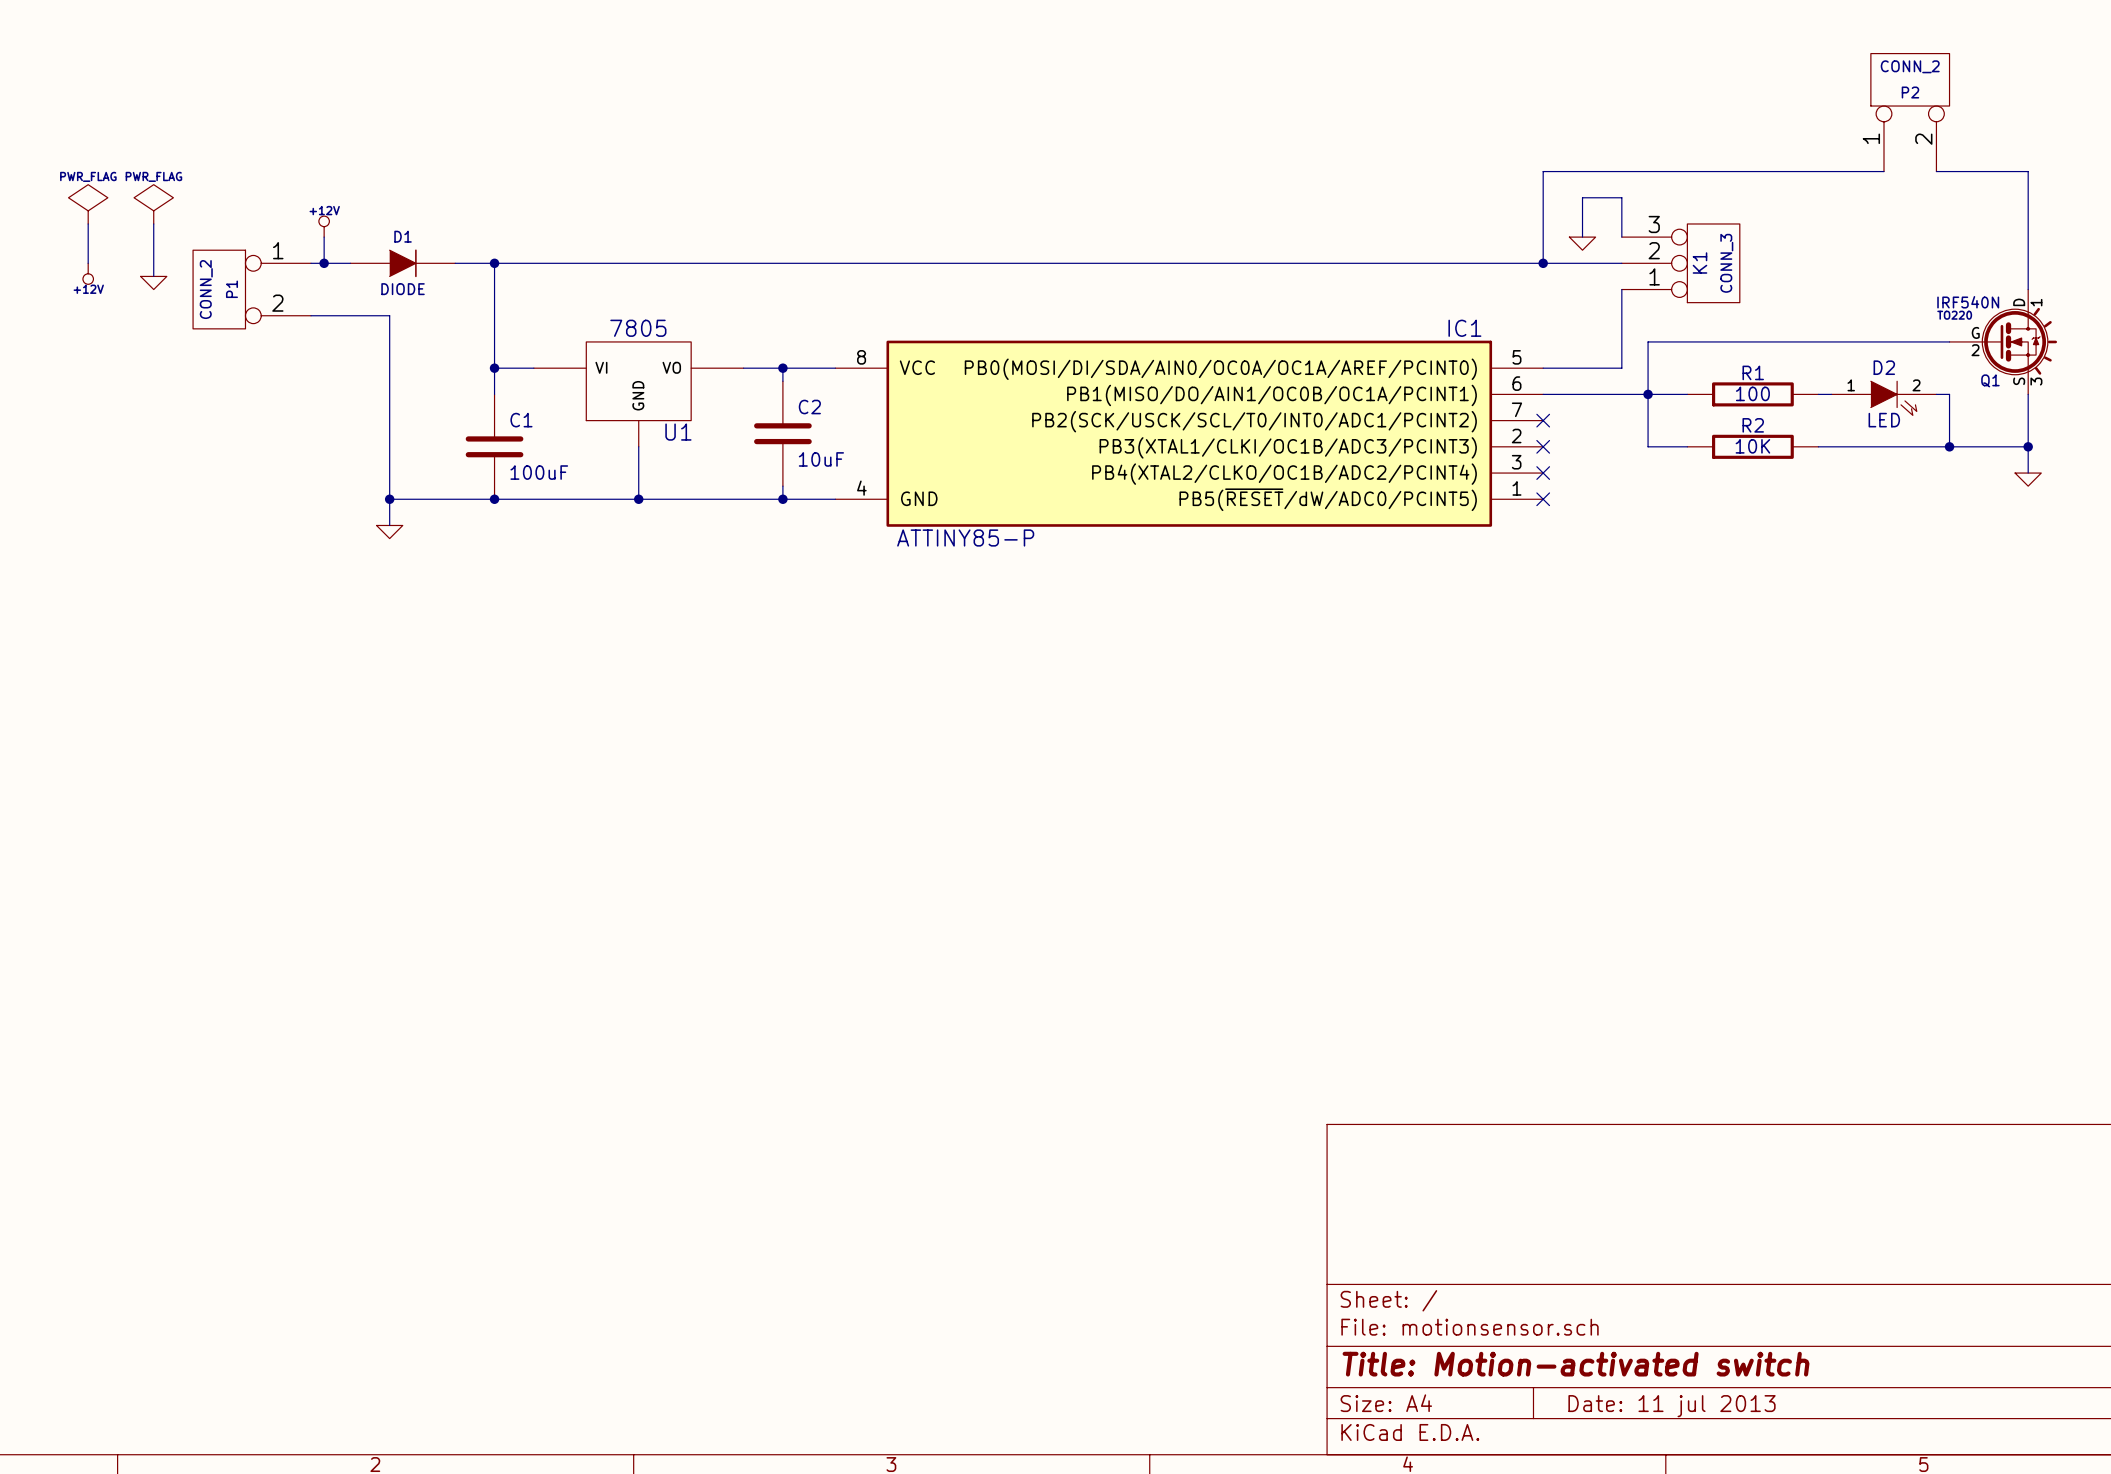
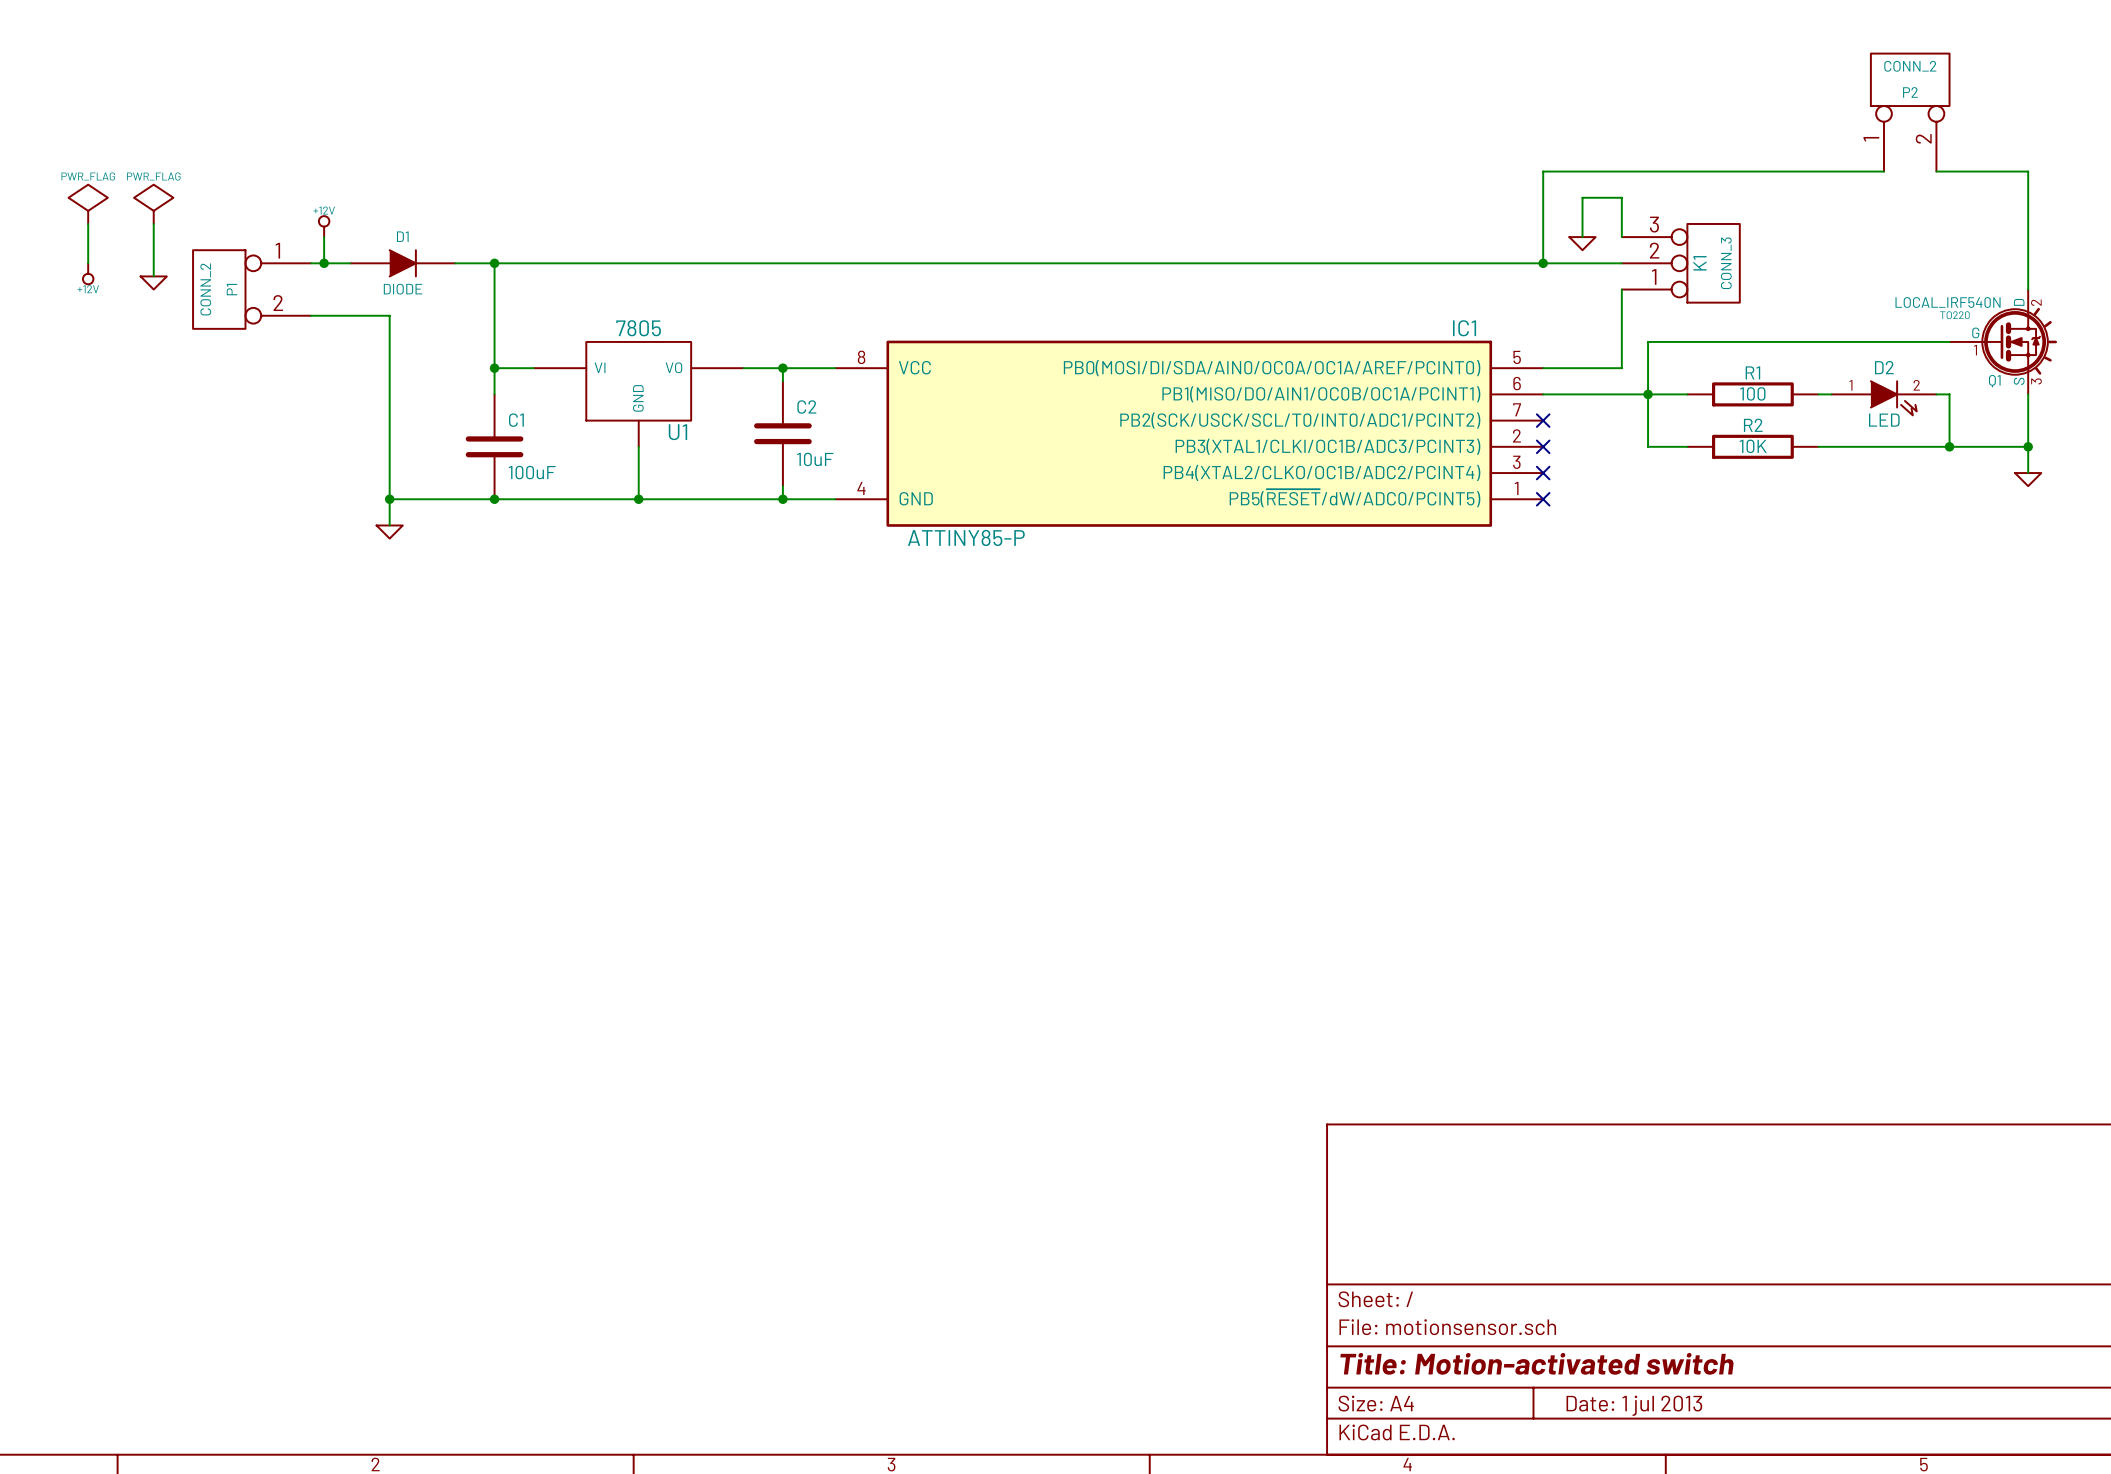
Q1 value: IRF540N (1968, 302) -> LOCAL_IRF540N (1948, 302)
Q1 pin number: 1 (2036, 302) -> 2 (2036, 302)
Q1 pin number: 2 (1975, 350) -> 1 (1975, 350)
title block: Date: 11 jul 2013 (1672, 1406) -> Date: 1 jul 2013 (1634, 1405)

